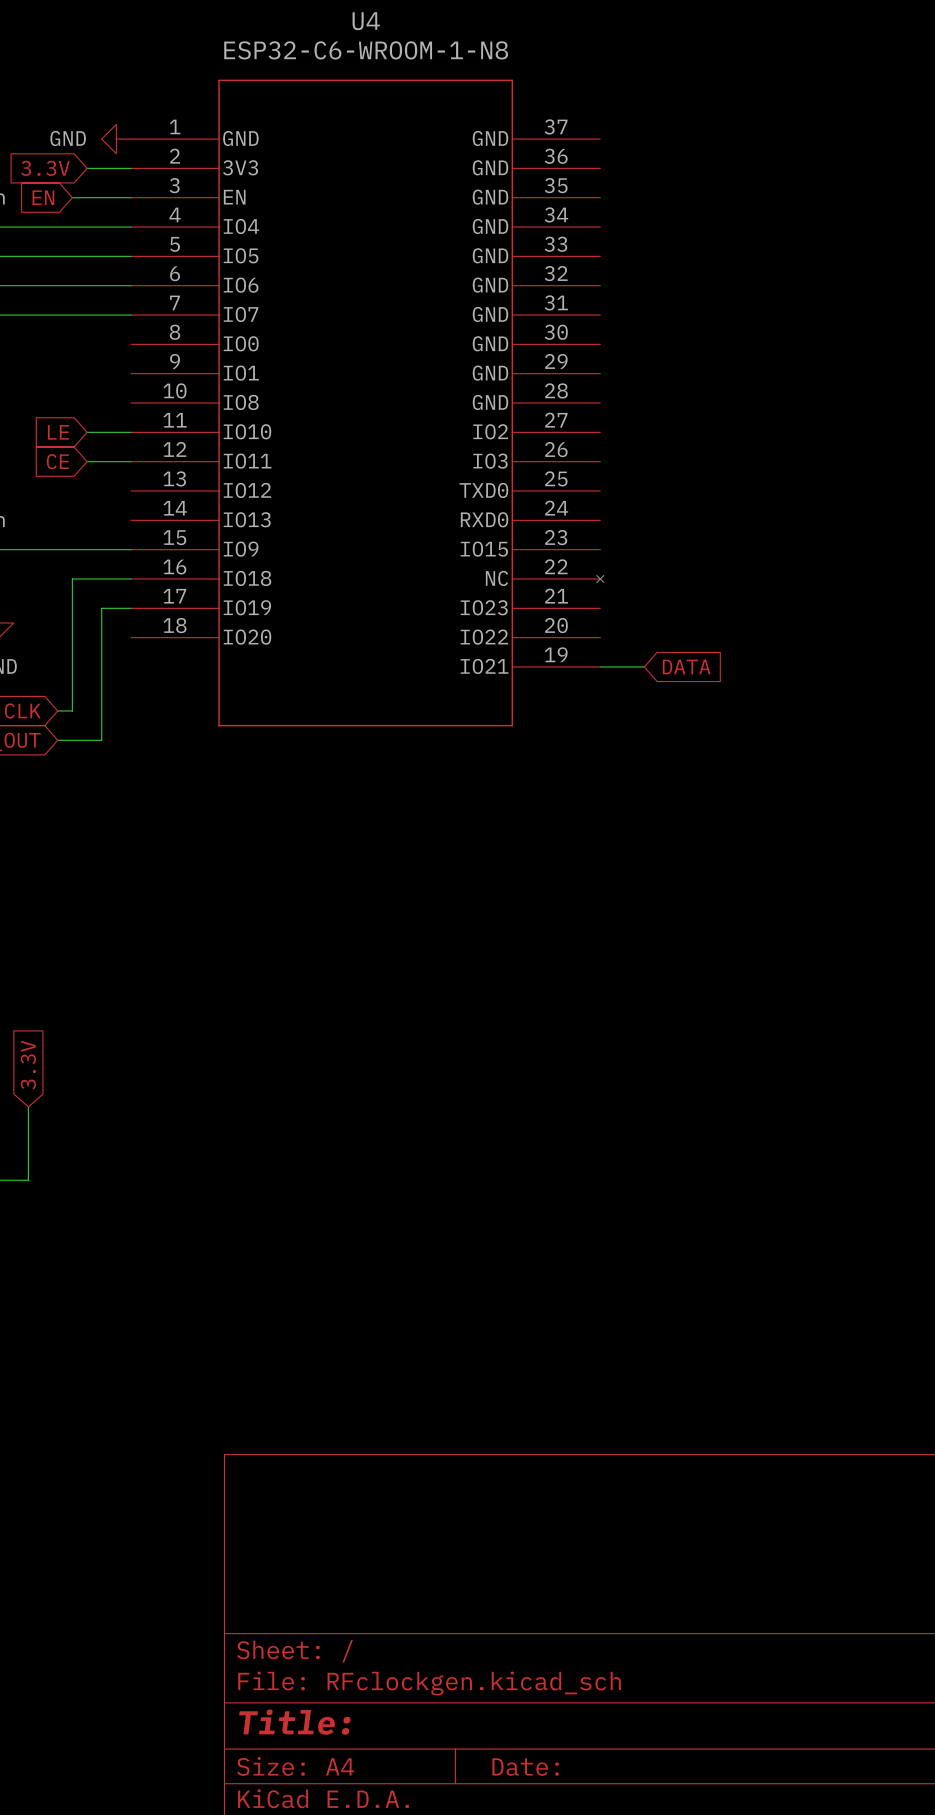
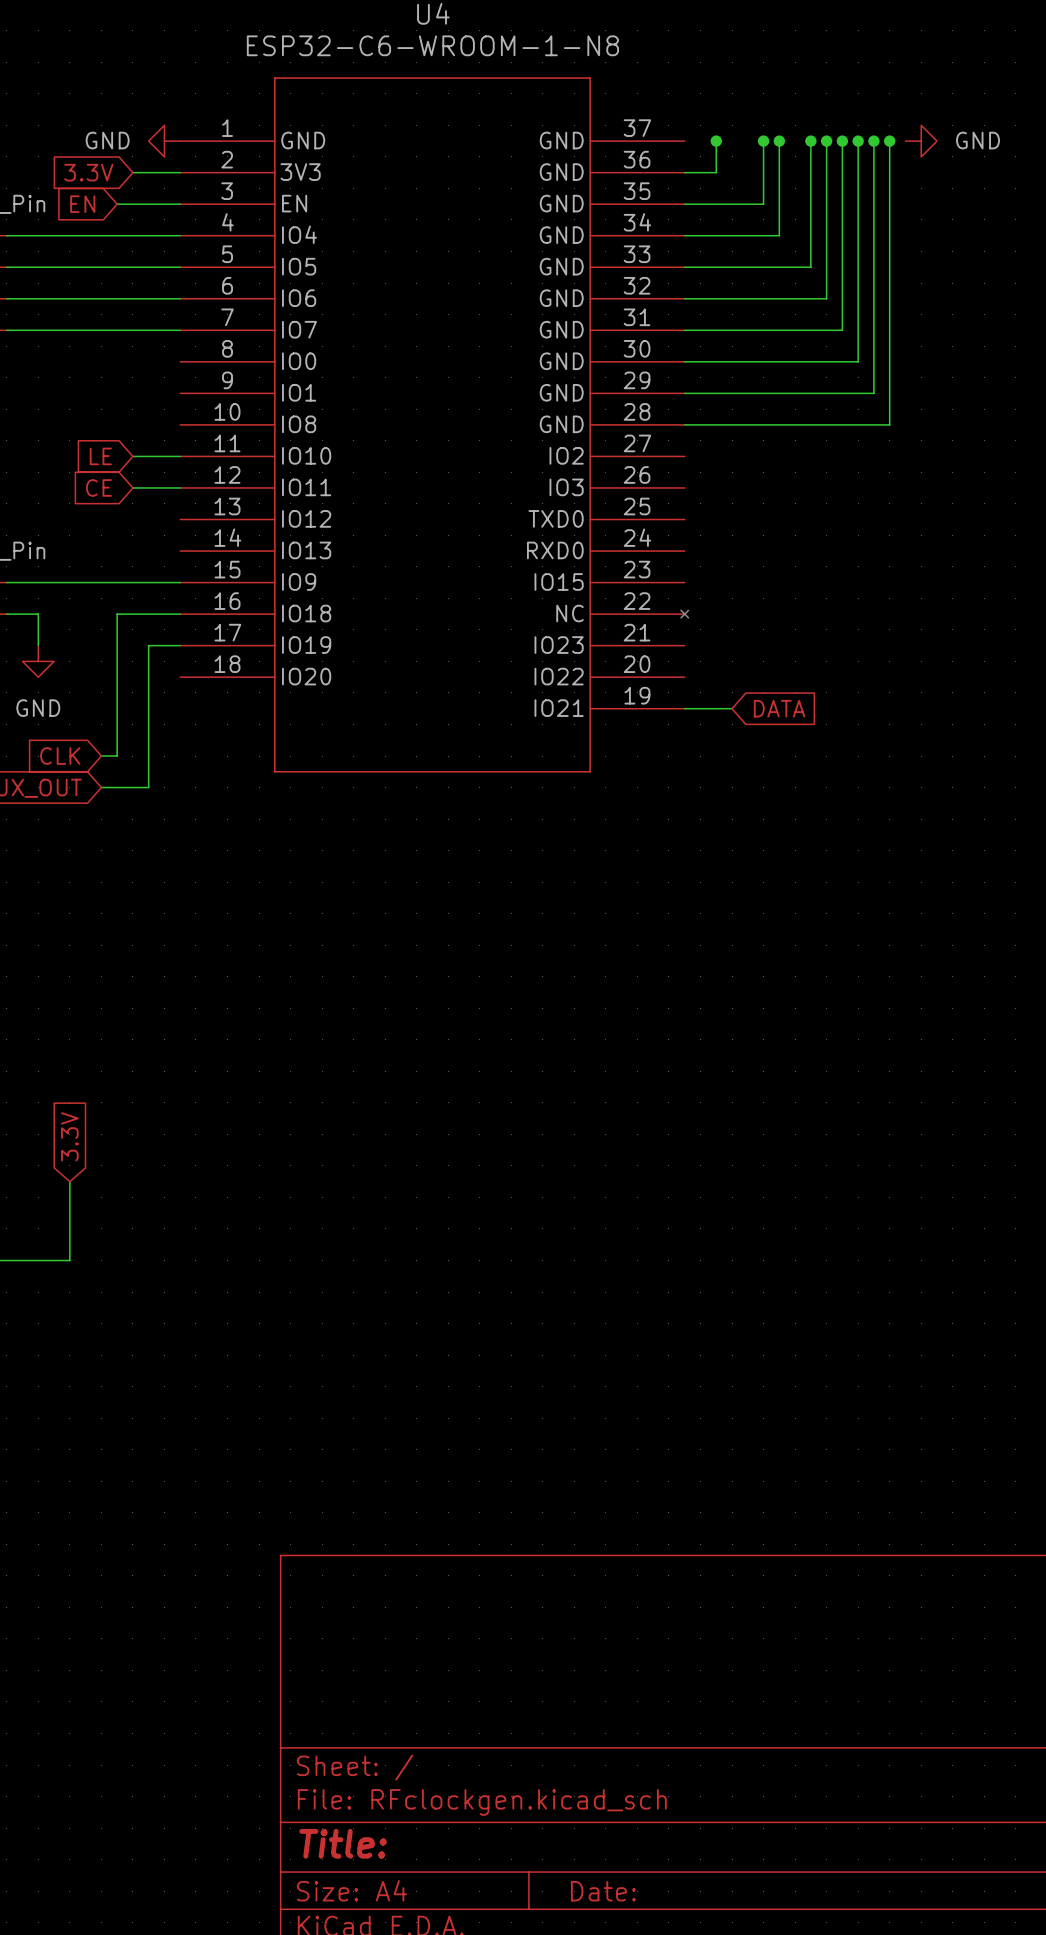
wire: none -> (716, 141) (716, 172) (684, 172)
junction: none -> (716, 141)
wire: none -> (763, 141) (763, 204) (684, 204)
junction: none -> (763, 141)
wire: none -> (779, 141) (779, 235) (684, 235)
junction: none -> (779, 141)
wire: none -> (810, 141) (810, 267) (684, 267)
junction: none -> (810, 141)
wire: none -> (826, 141) (826, 298) (684, 298)
junction: none -> (826, 141)
wire: none -> (842, 141) (842, 330) (684, 330)
junction: none -> (842, 141)
wire: none -> (858, 141) (858, 361) (684, 361)
junction: none -> (858, 141)
wire: none -> (873, 141) (873, 393) (684, 393)
junction: none -> (873, 141)
wire: none -> (889, 141) (889, 424) (684, 424)
junction: none -> (889, 141)
power symbol: none -> GND (921, 141)

